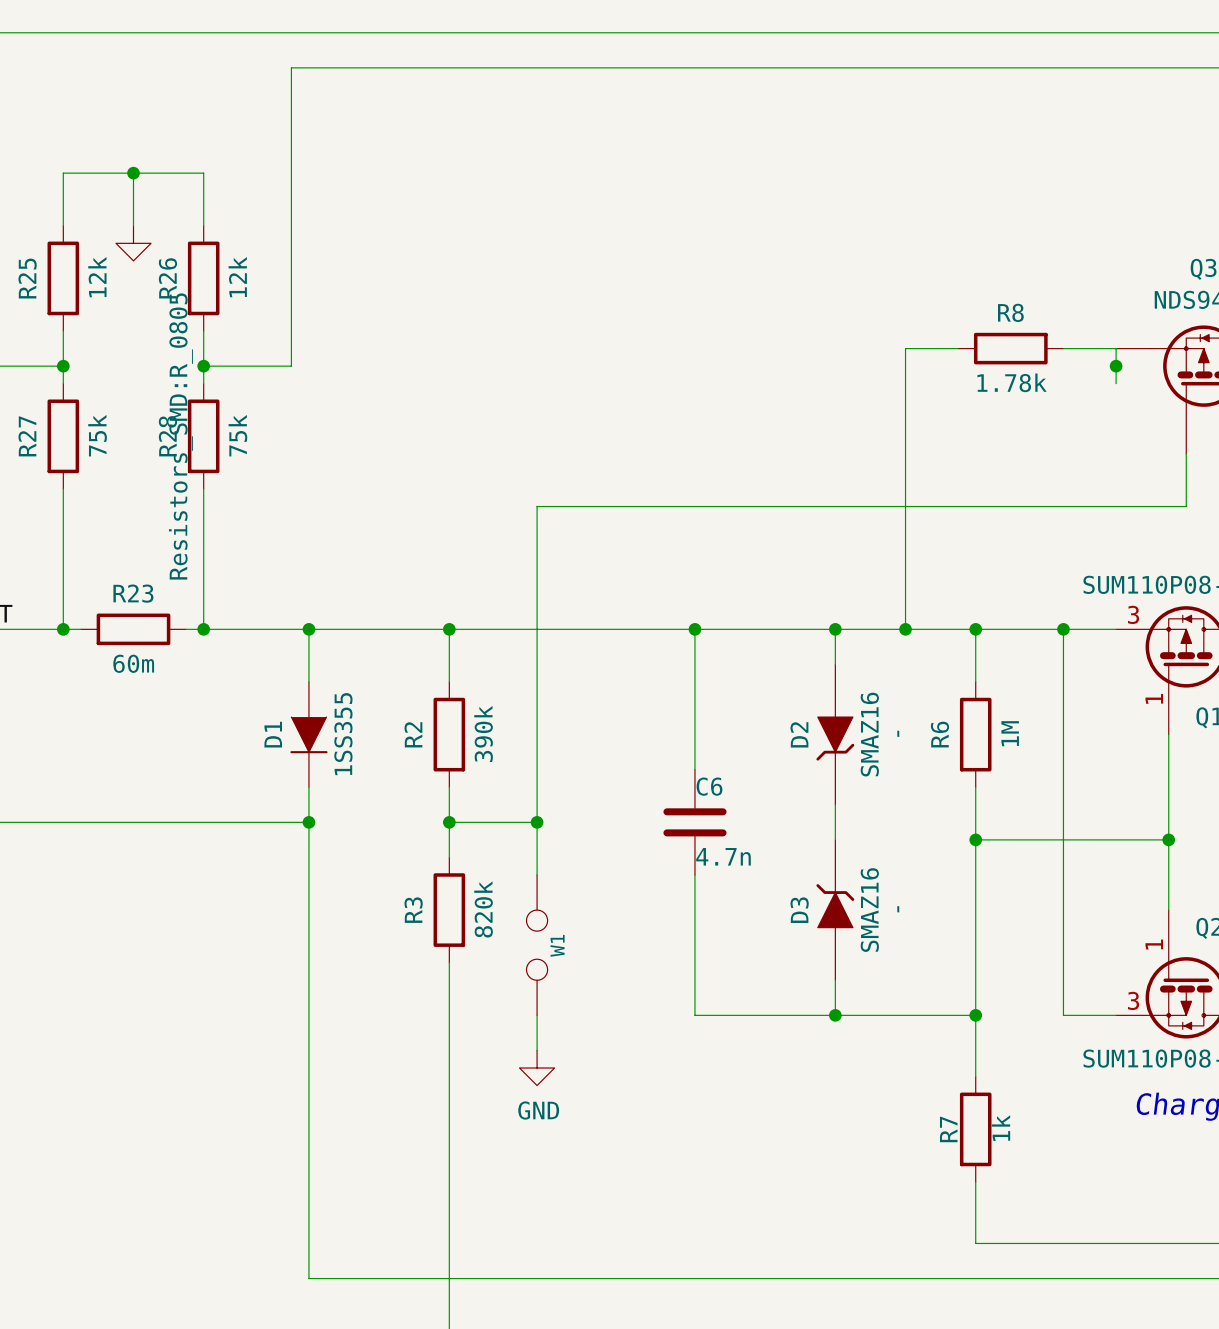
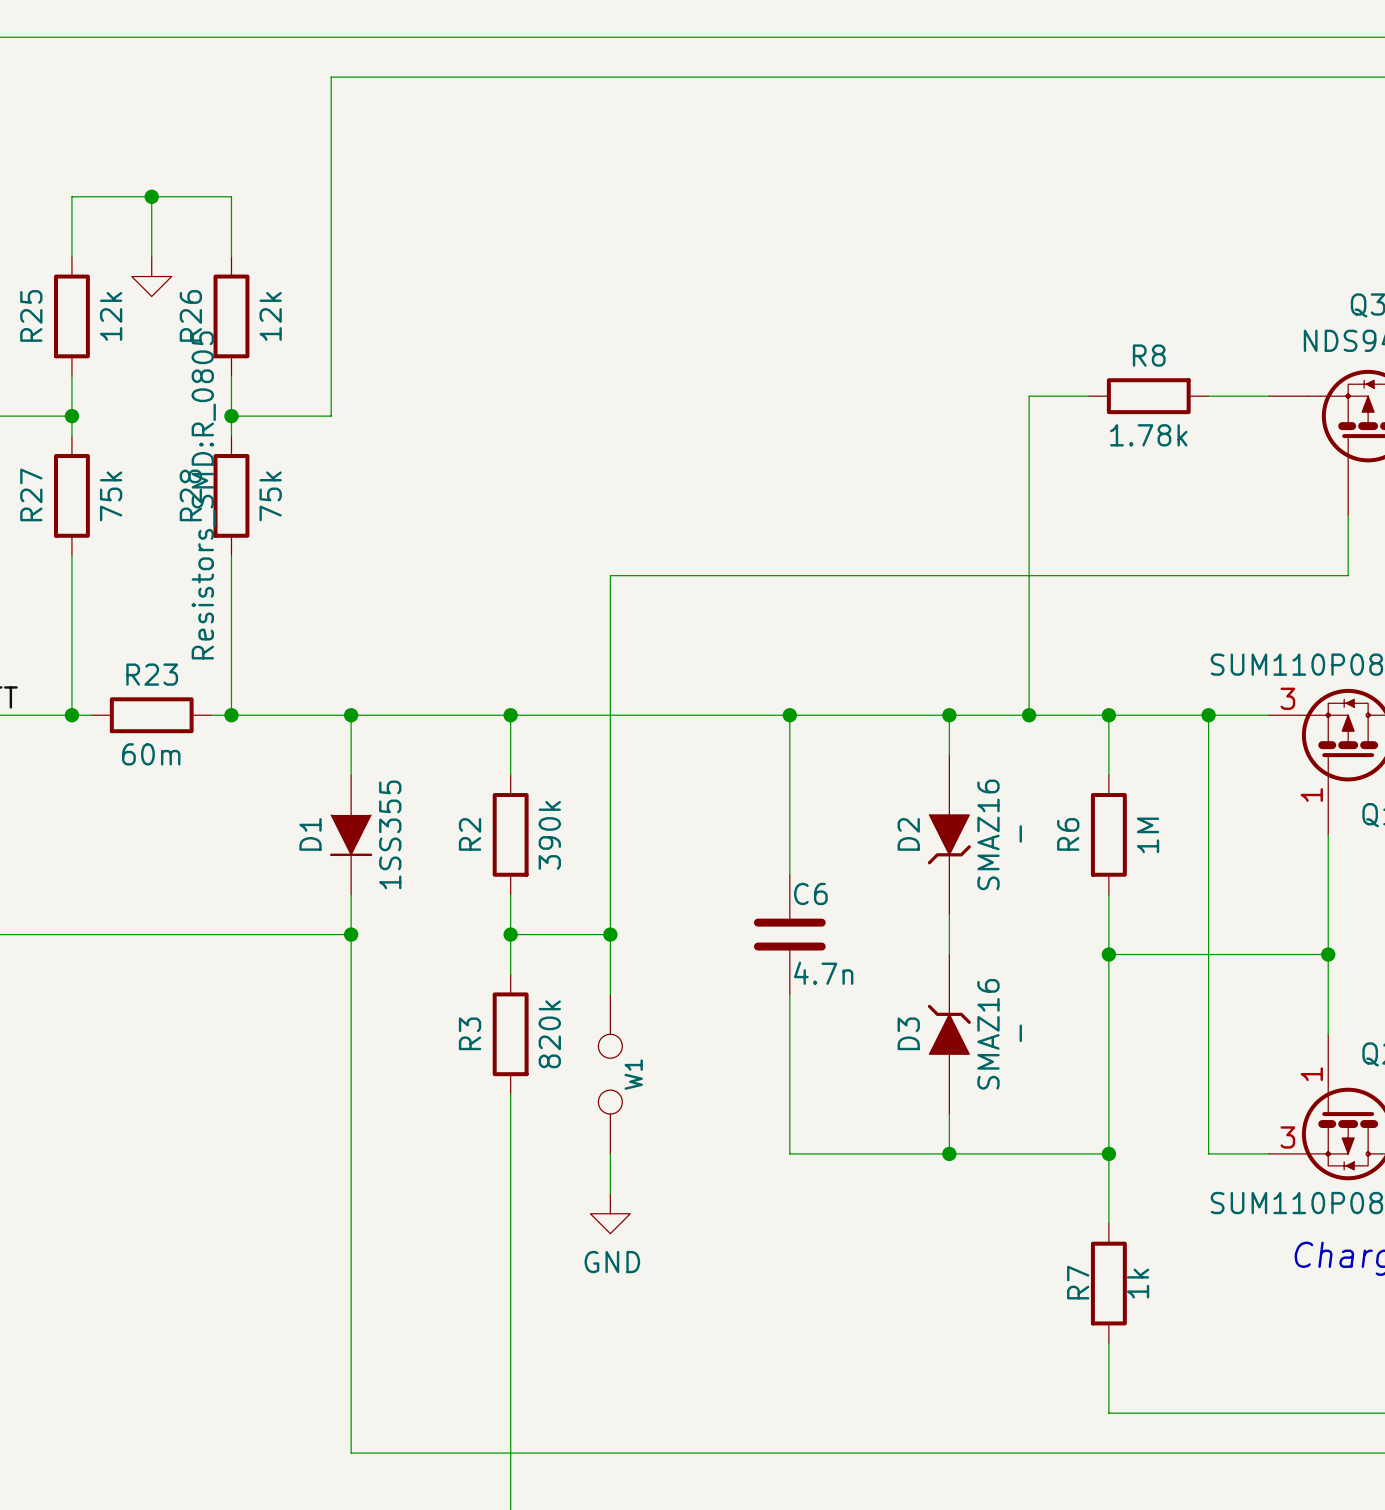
wire: (1116, 348) (1116, 383) -> none
junction: (1116, 366) -> none

